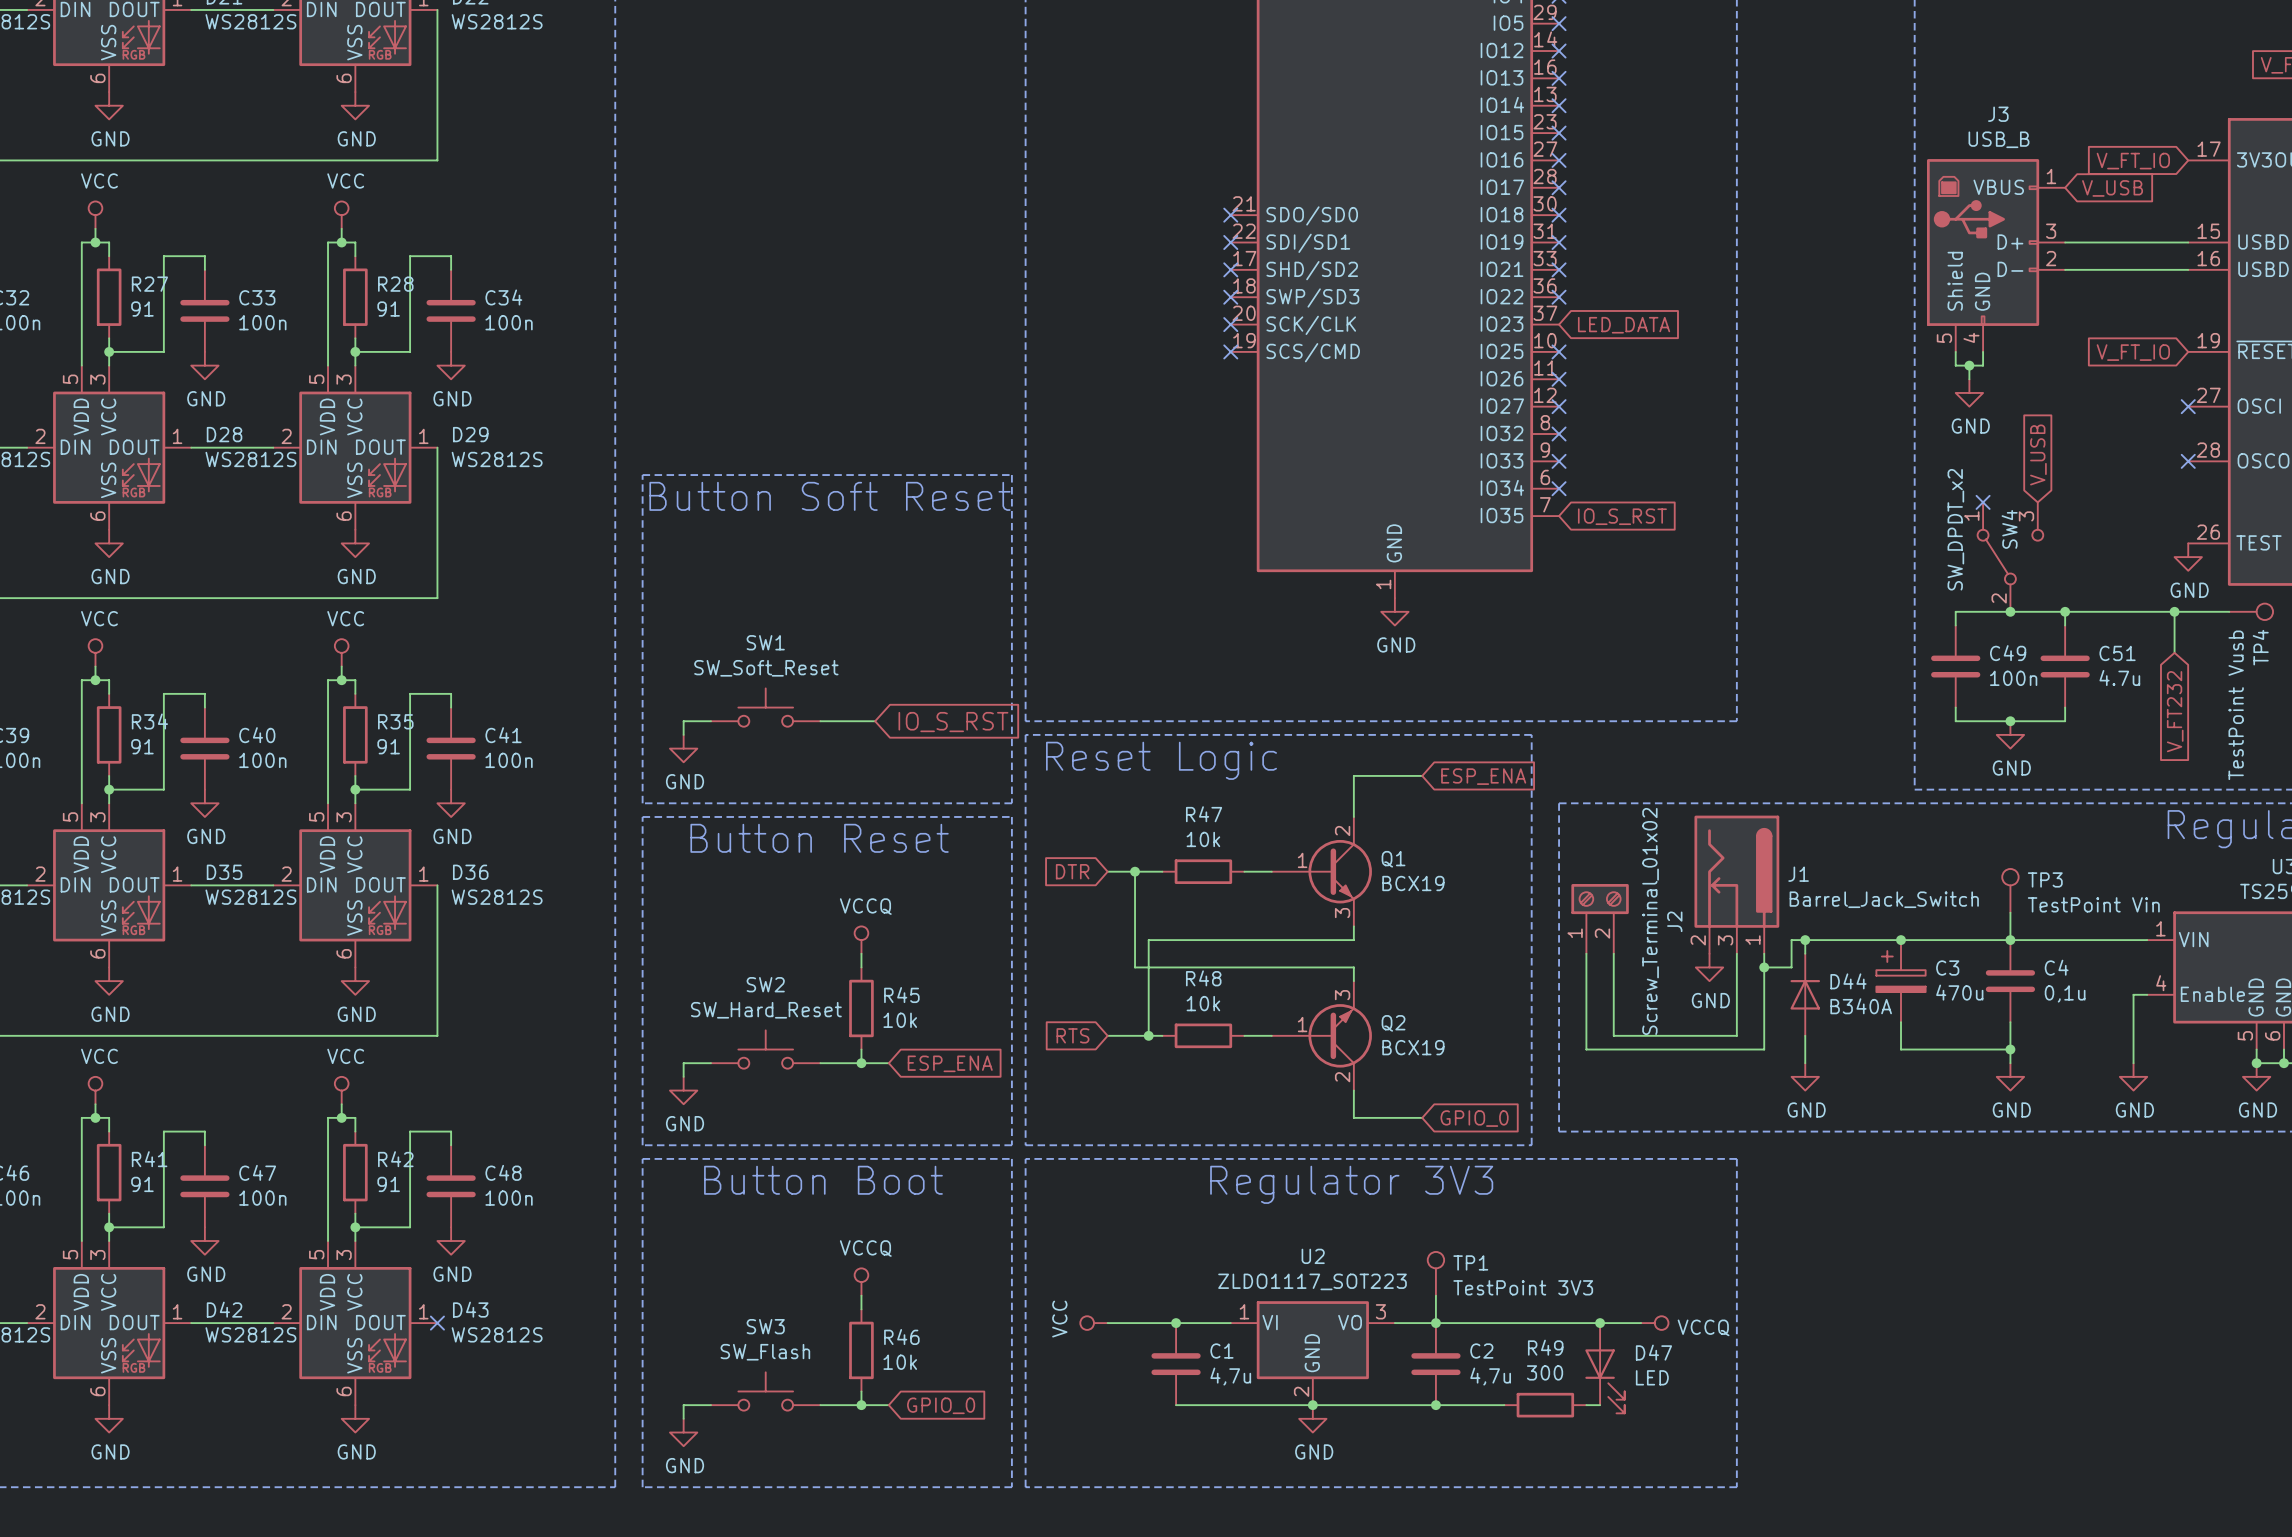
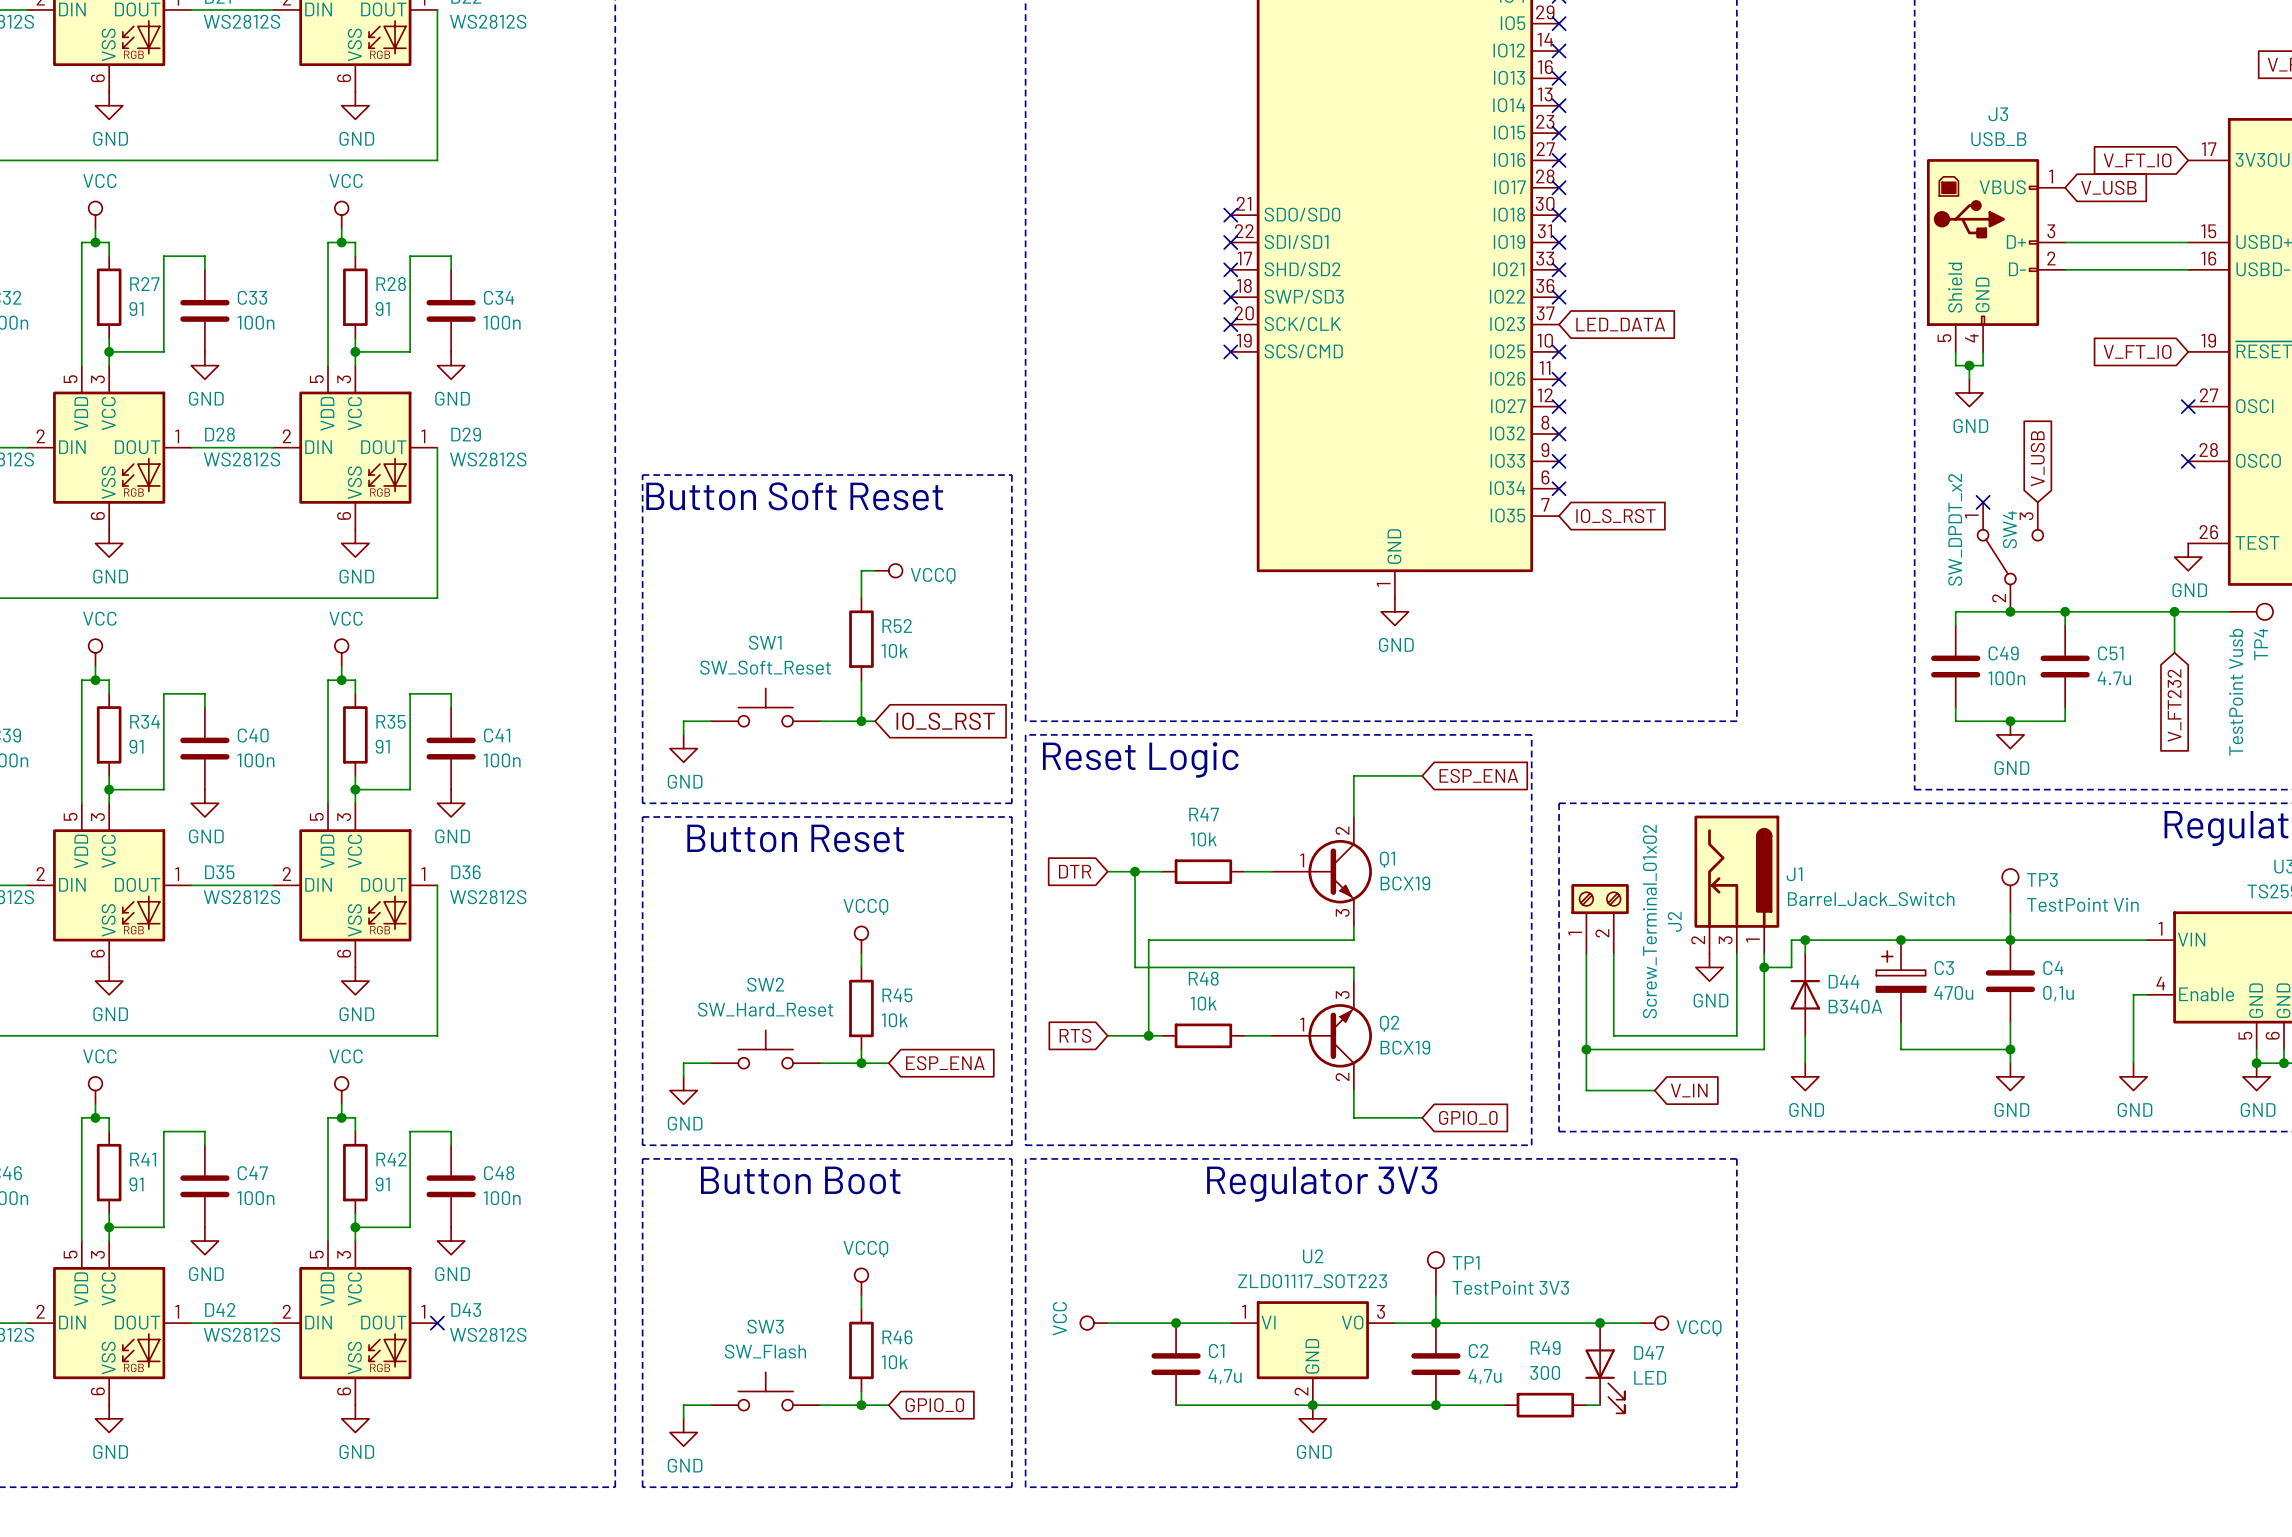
wire: none -> (875, 570) (861, 570) (861, 598)
power symbol: none -> VCCQ (888, 570)
R52: none -> 10k (861, 639)
wire: none -> (861, 680) (861, 721)
junction: none -> (861, 721)
wire: none -> (1586, 1049) (1586, 1090) (1654, 1090)
junction: none -> (1586, 1049)
global label: none -> V_IN (1689, 1090)

